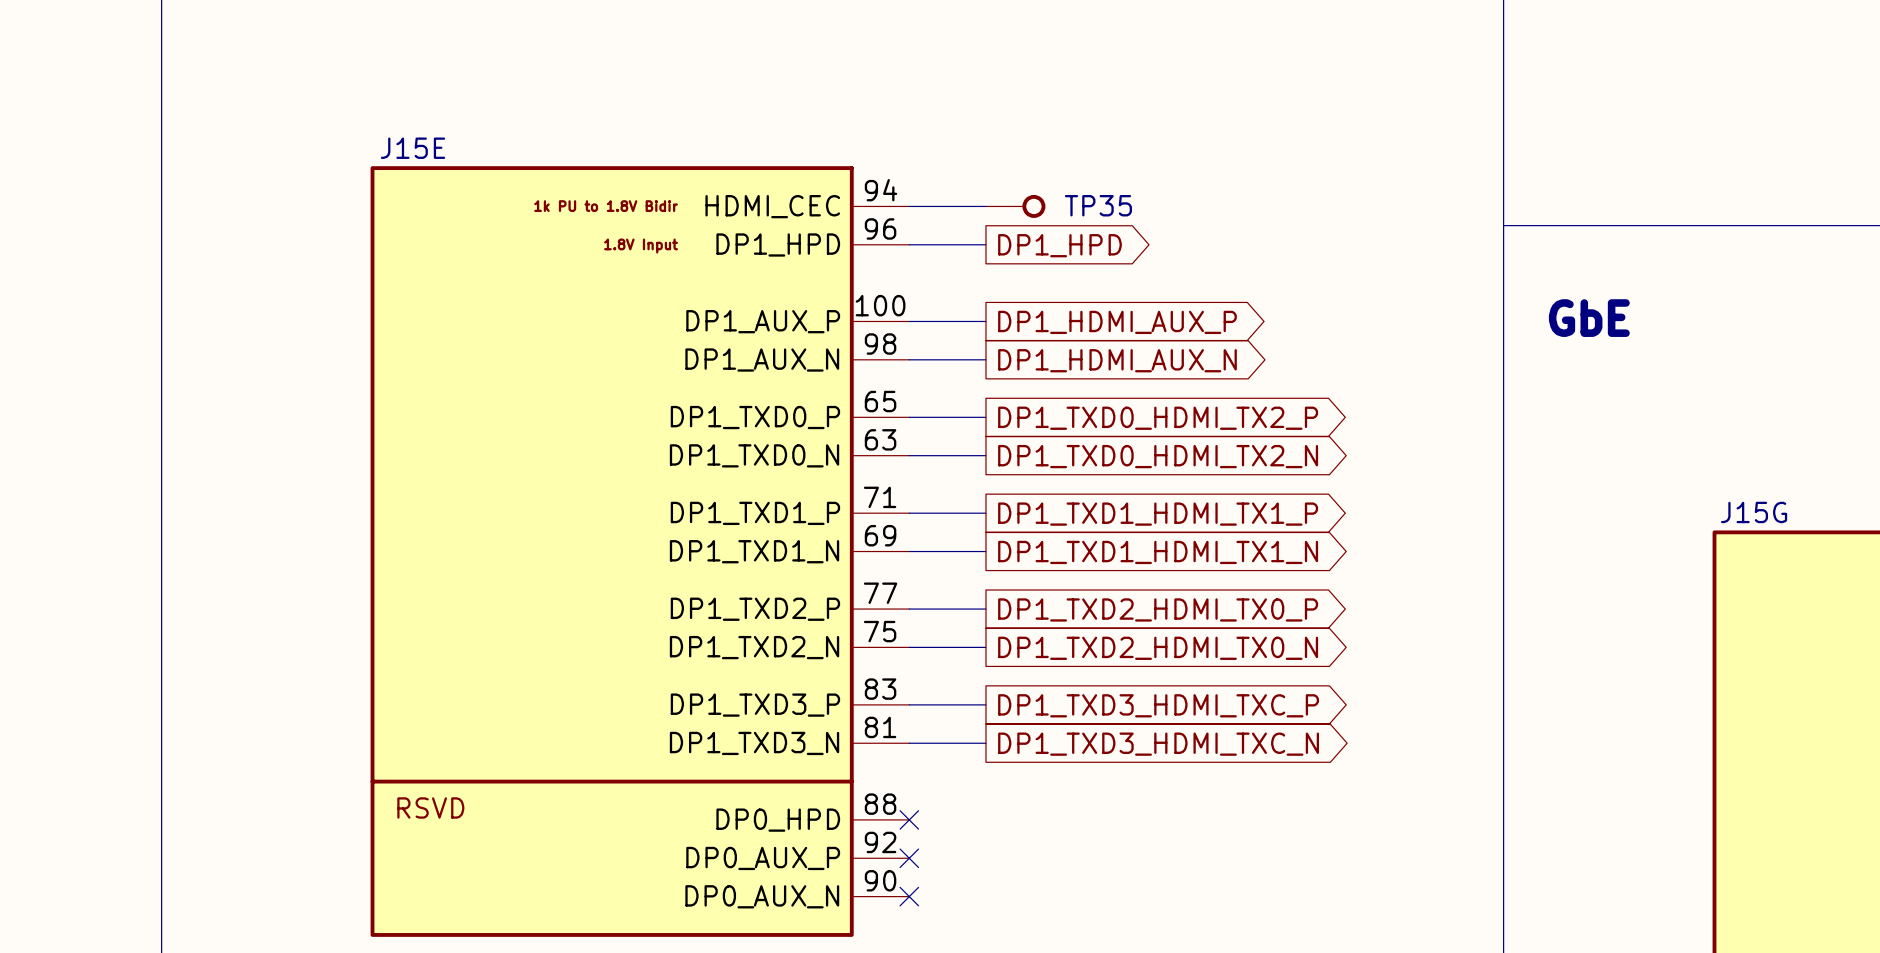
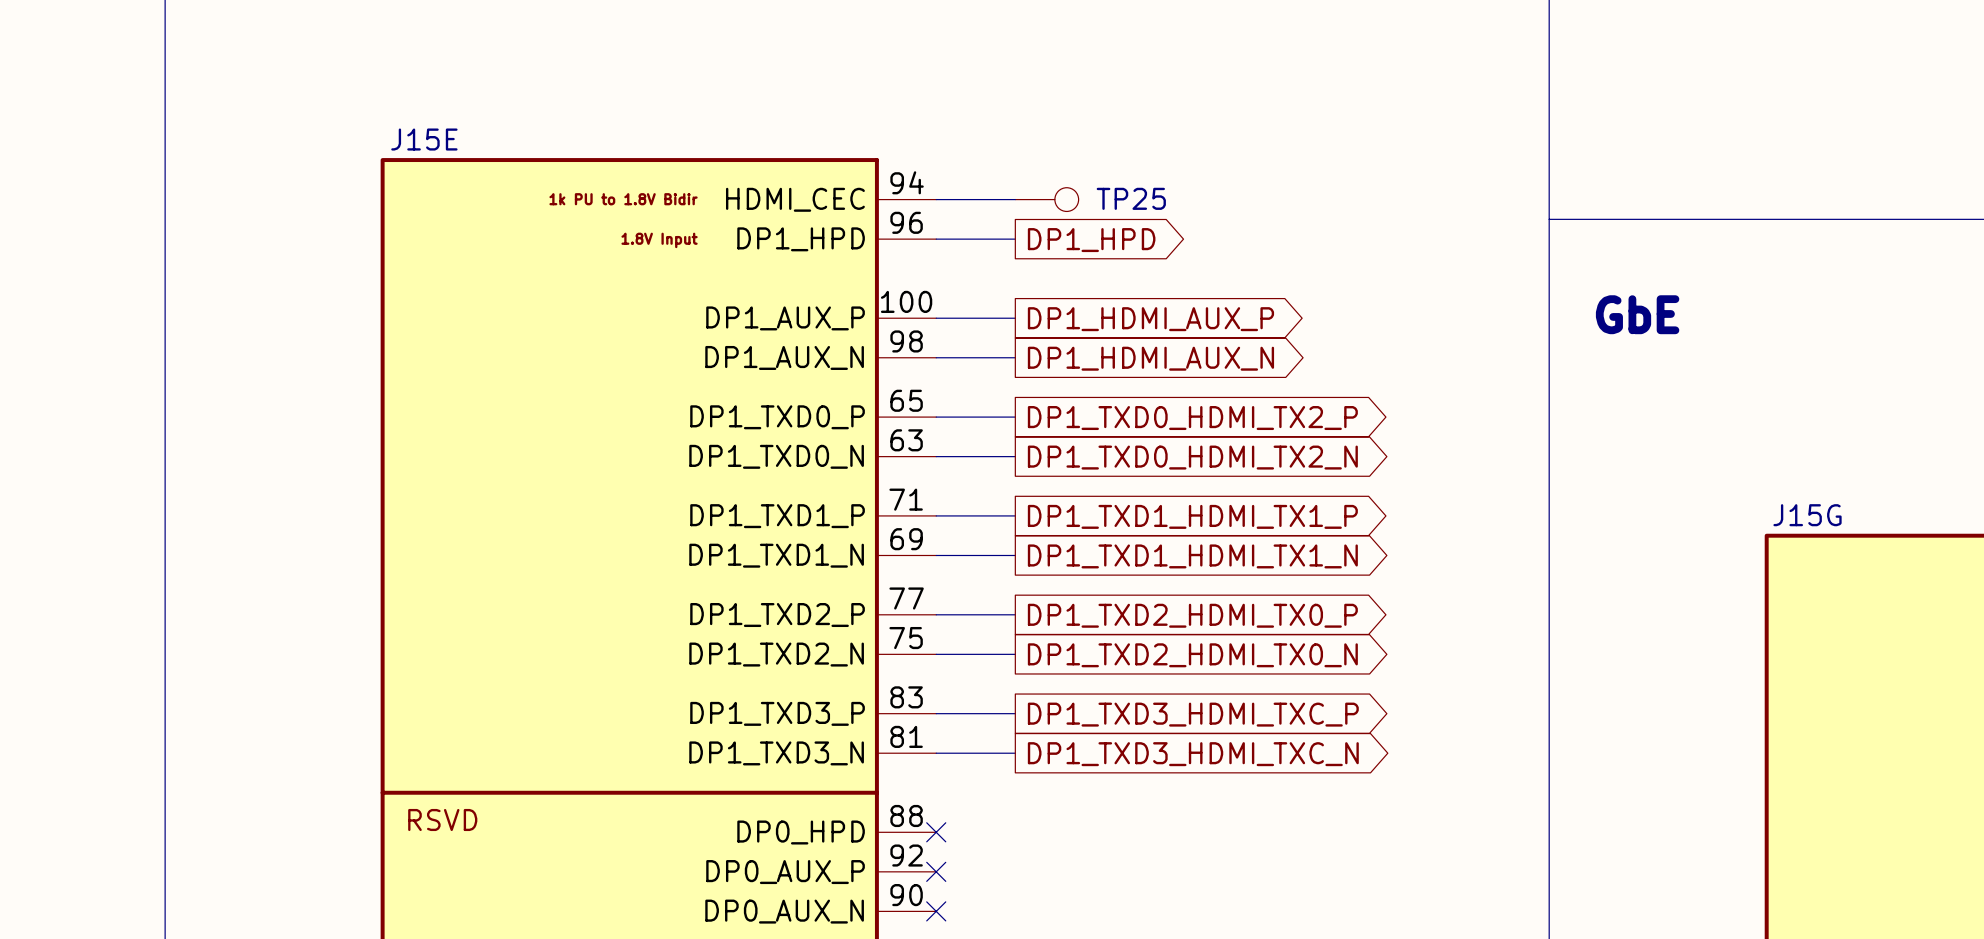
TP35: (1015, 206) -> none
TP25: none -> (1046, 199)

